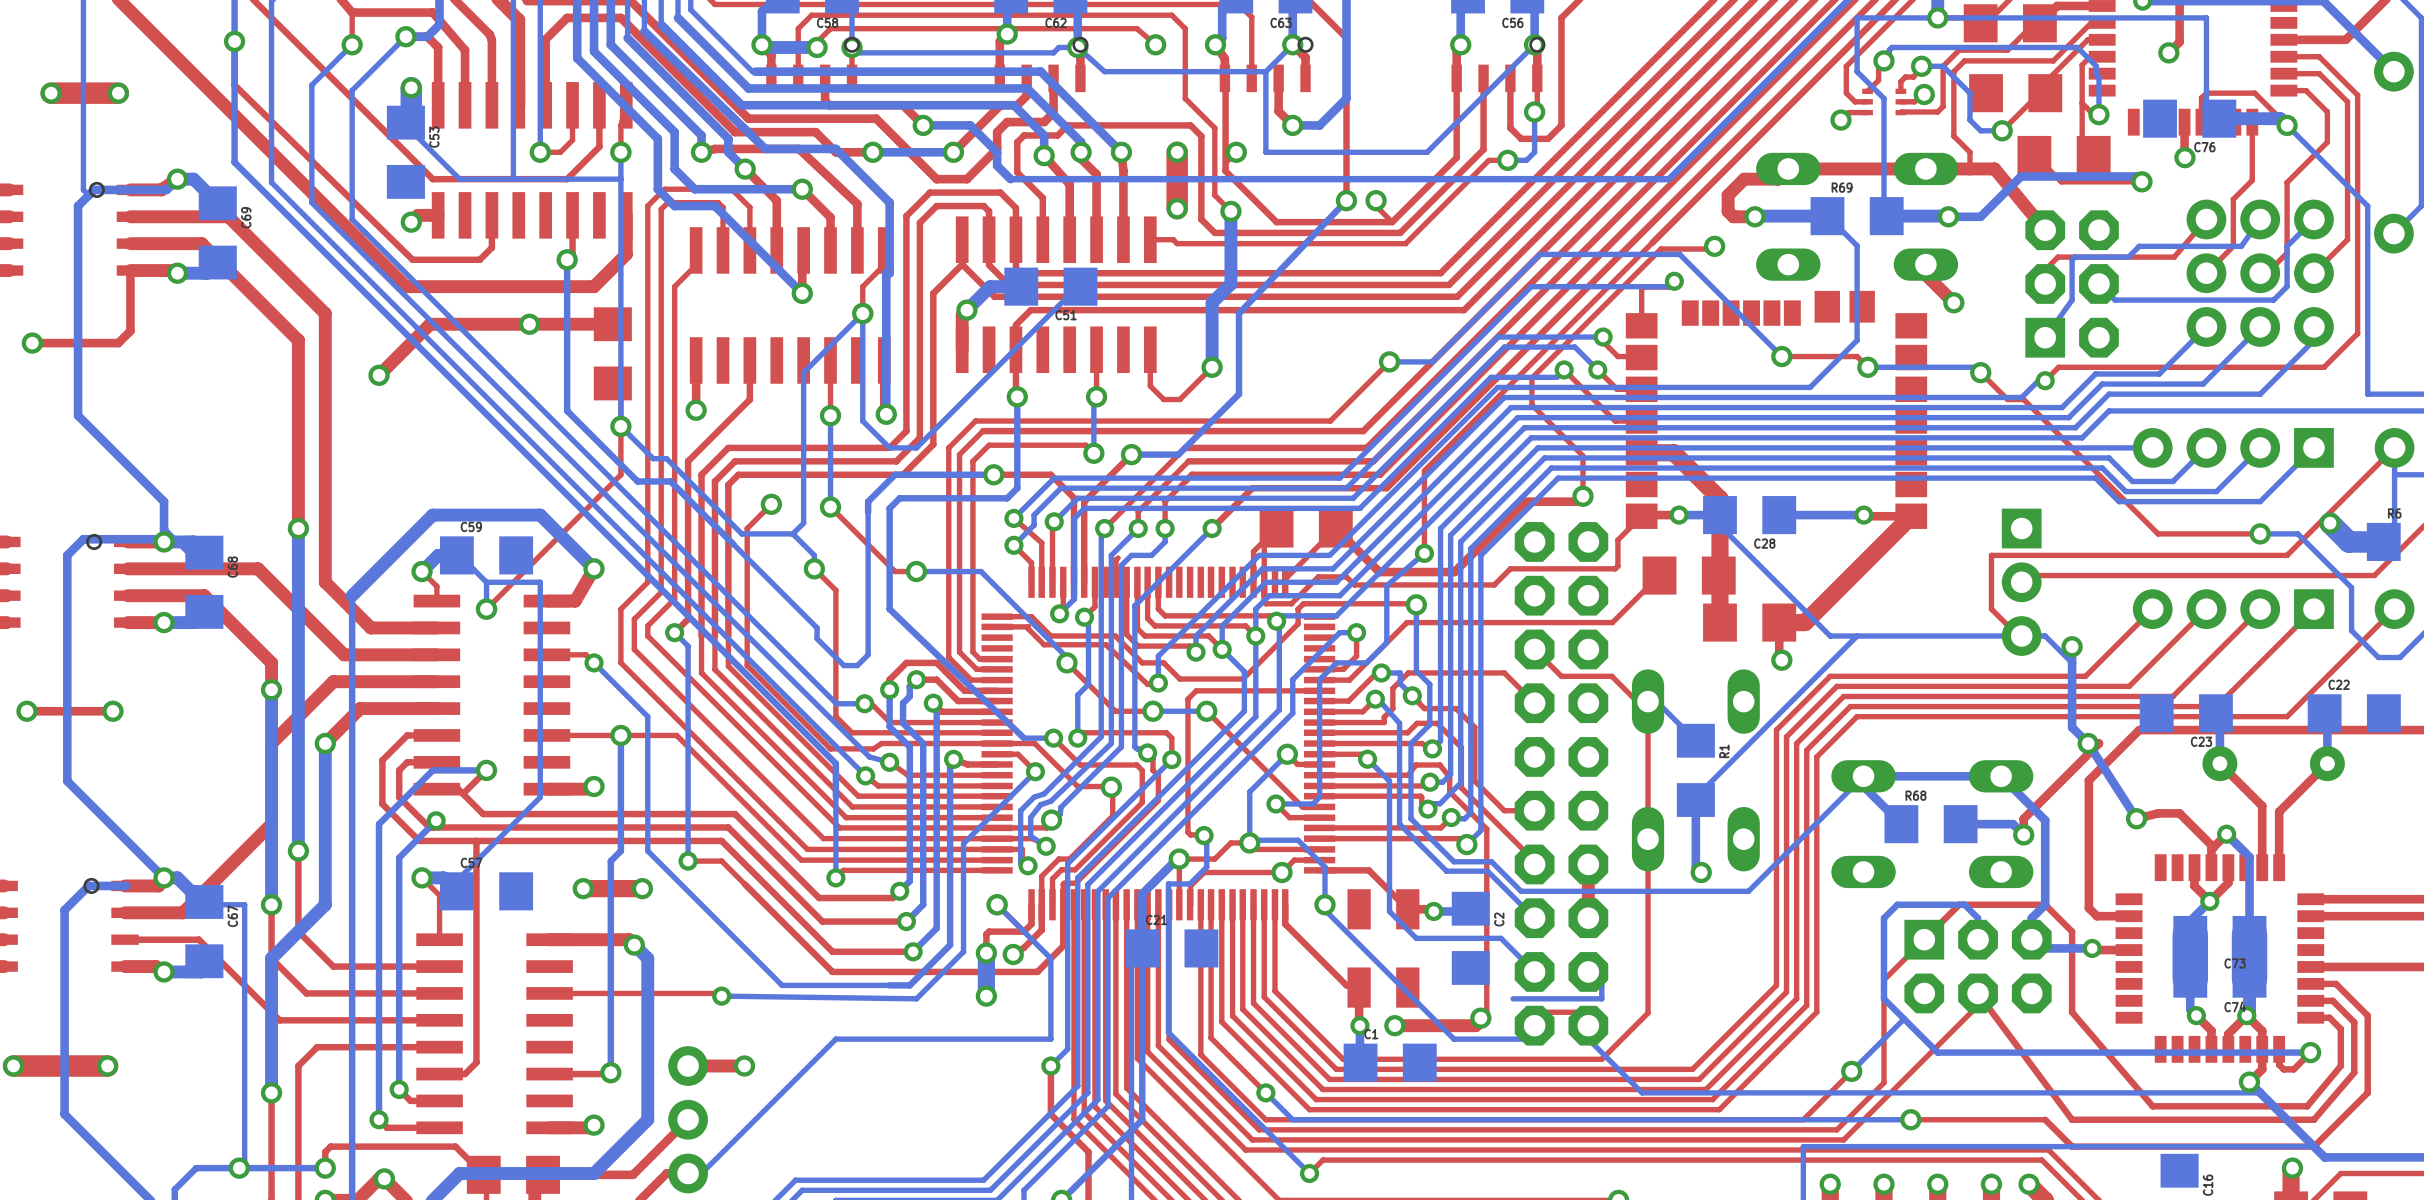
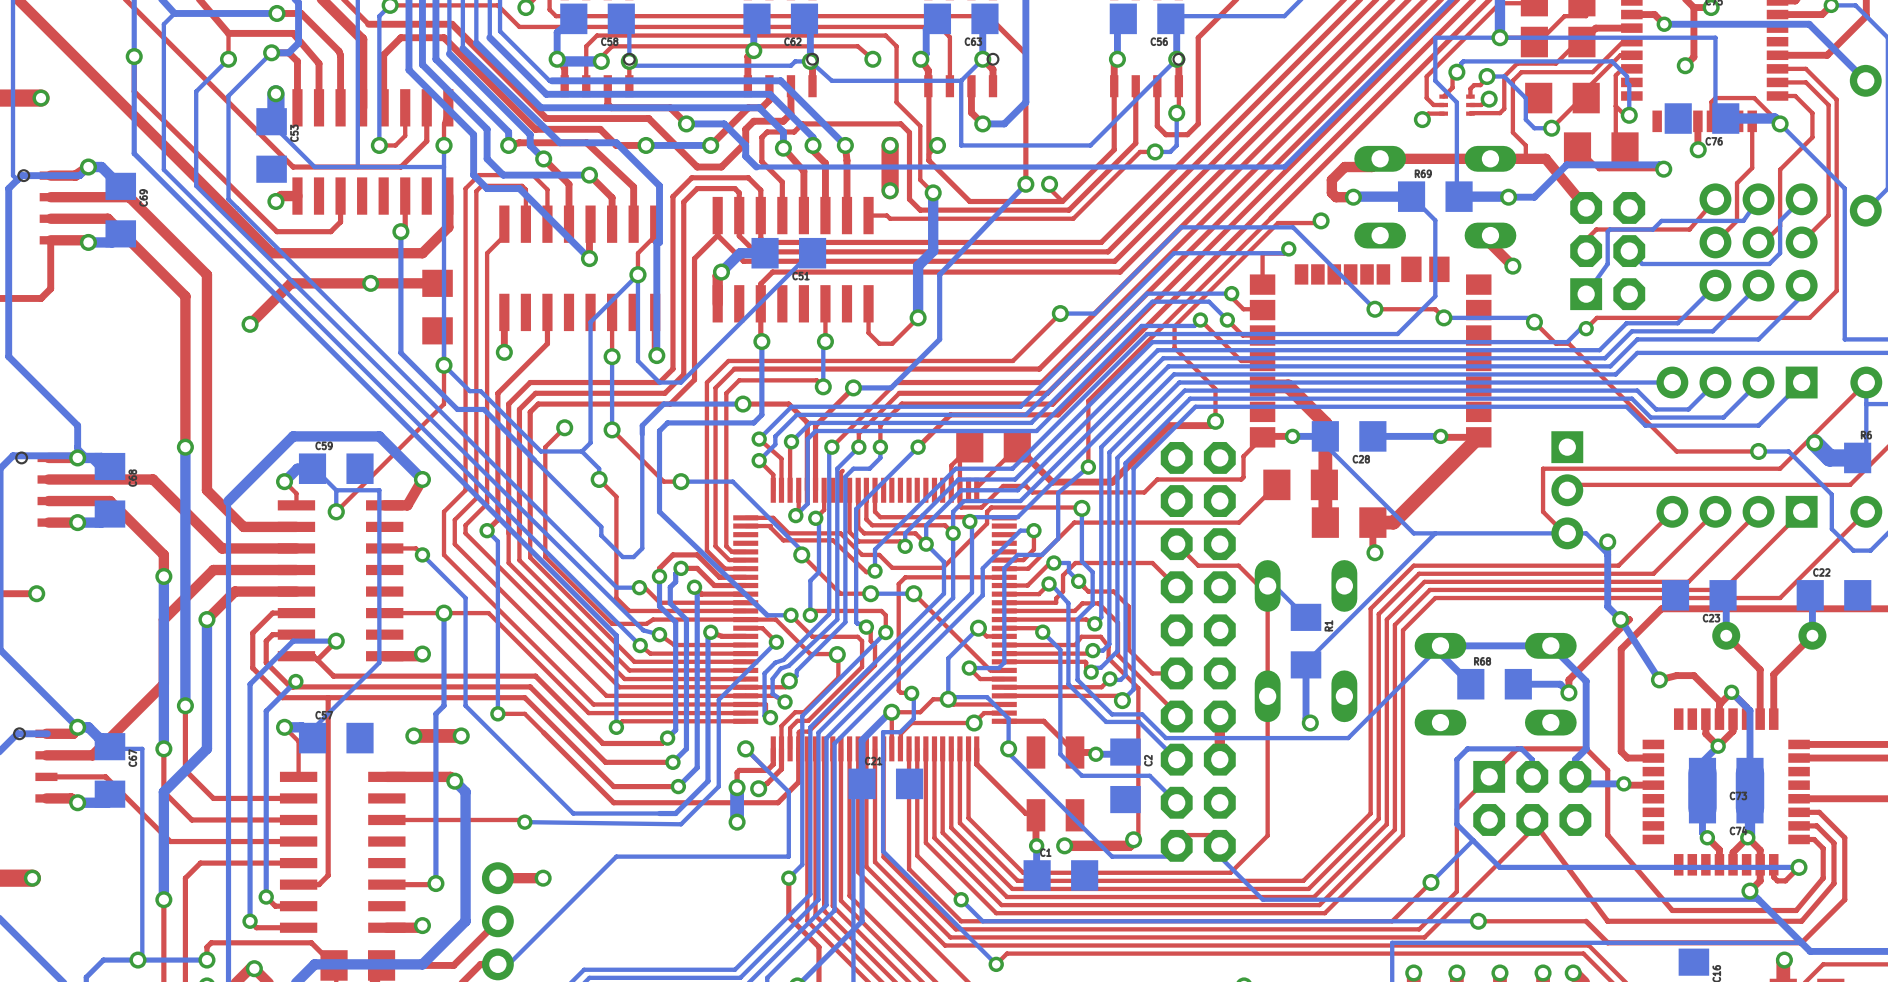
bottom track: (1588, 971) (1601, 985) (1601, 998) (1513, 998) -> none

